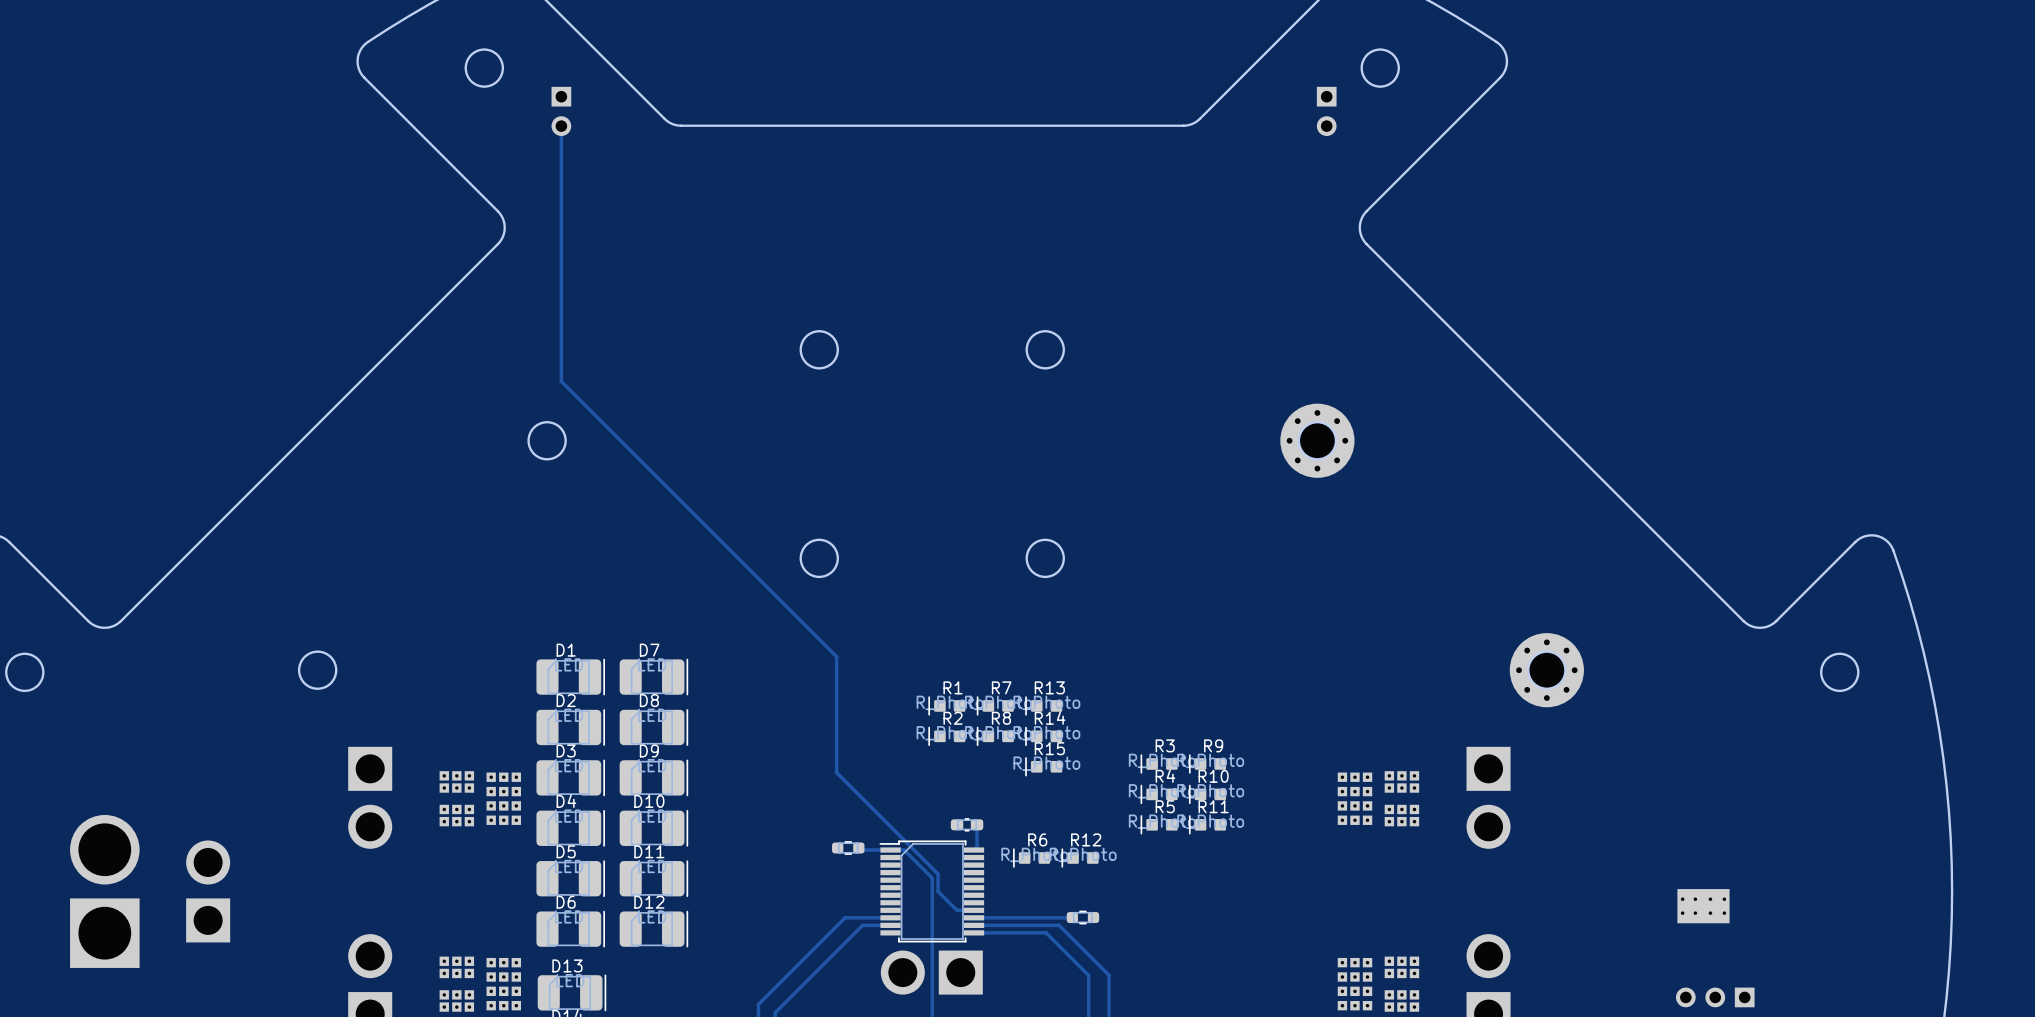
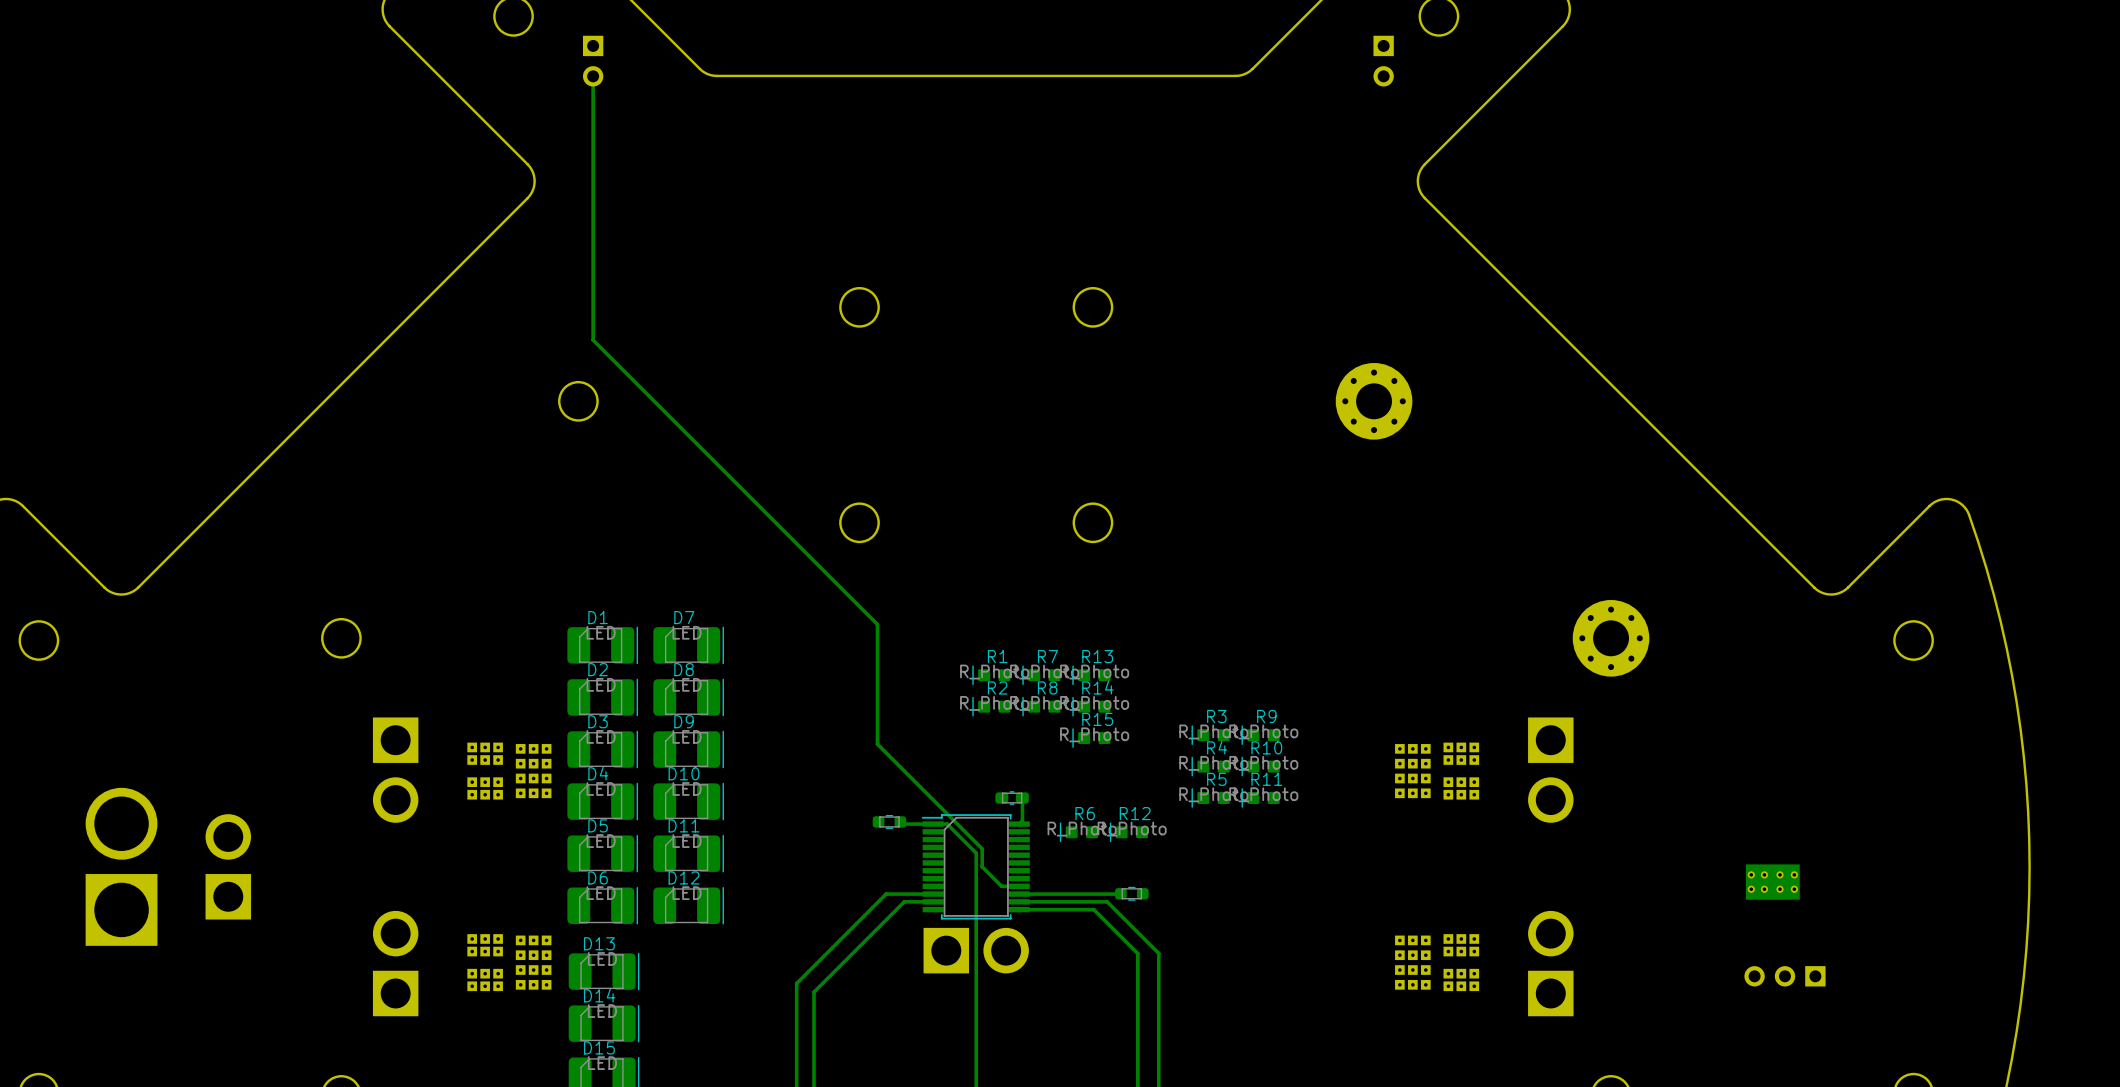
part rotation: 0° (931, 972) -> 180° (976, 950)

